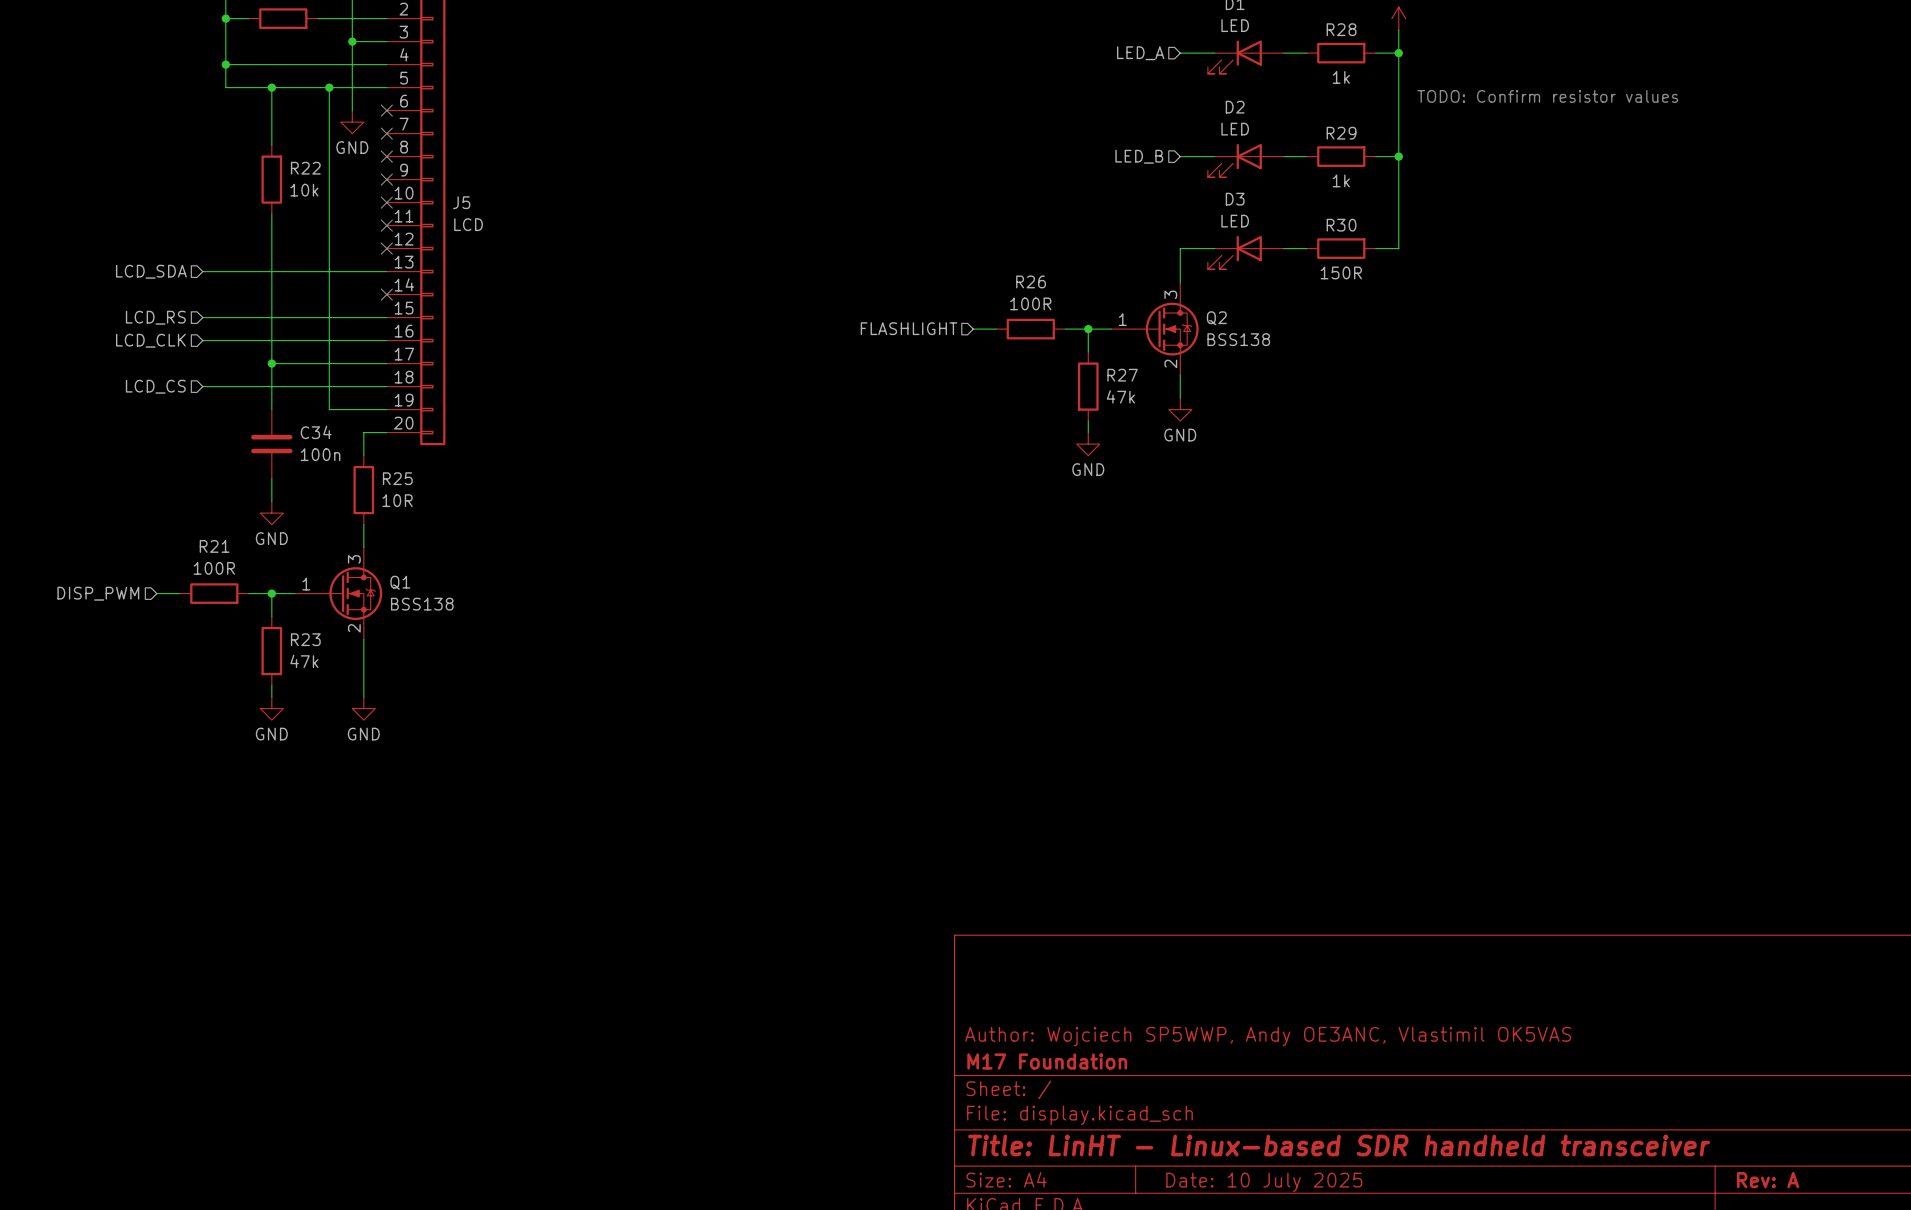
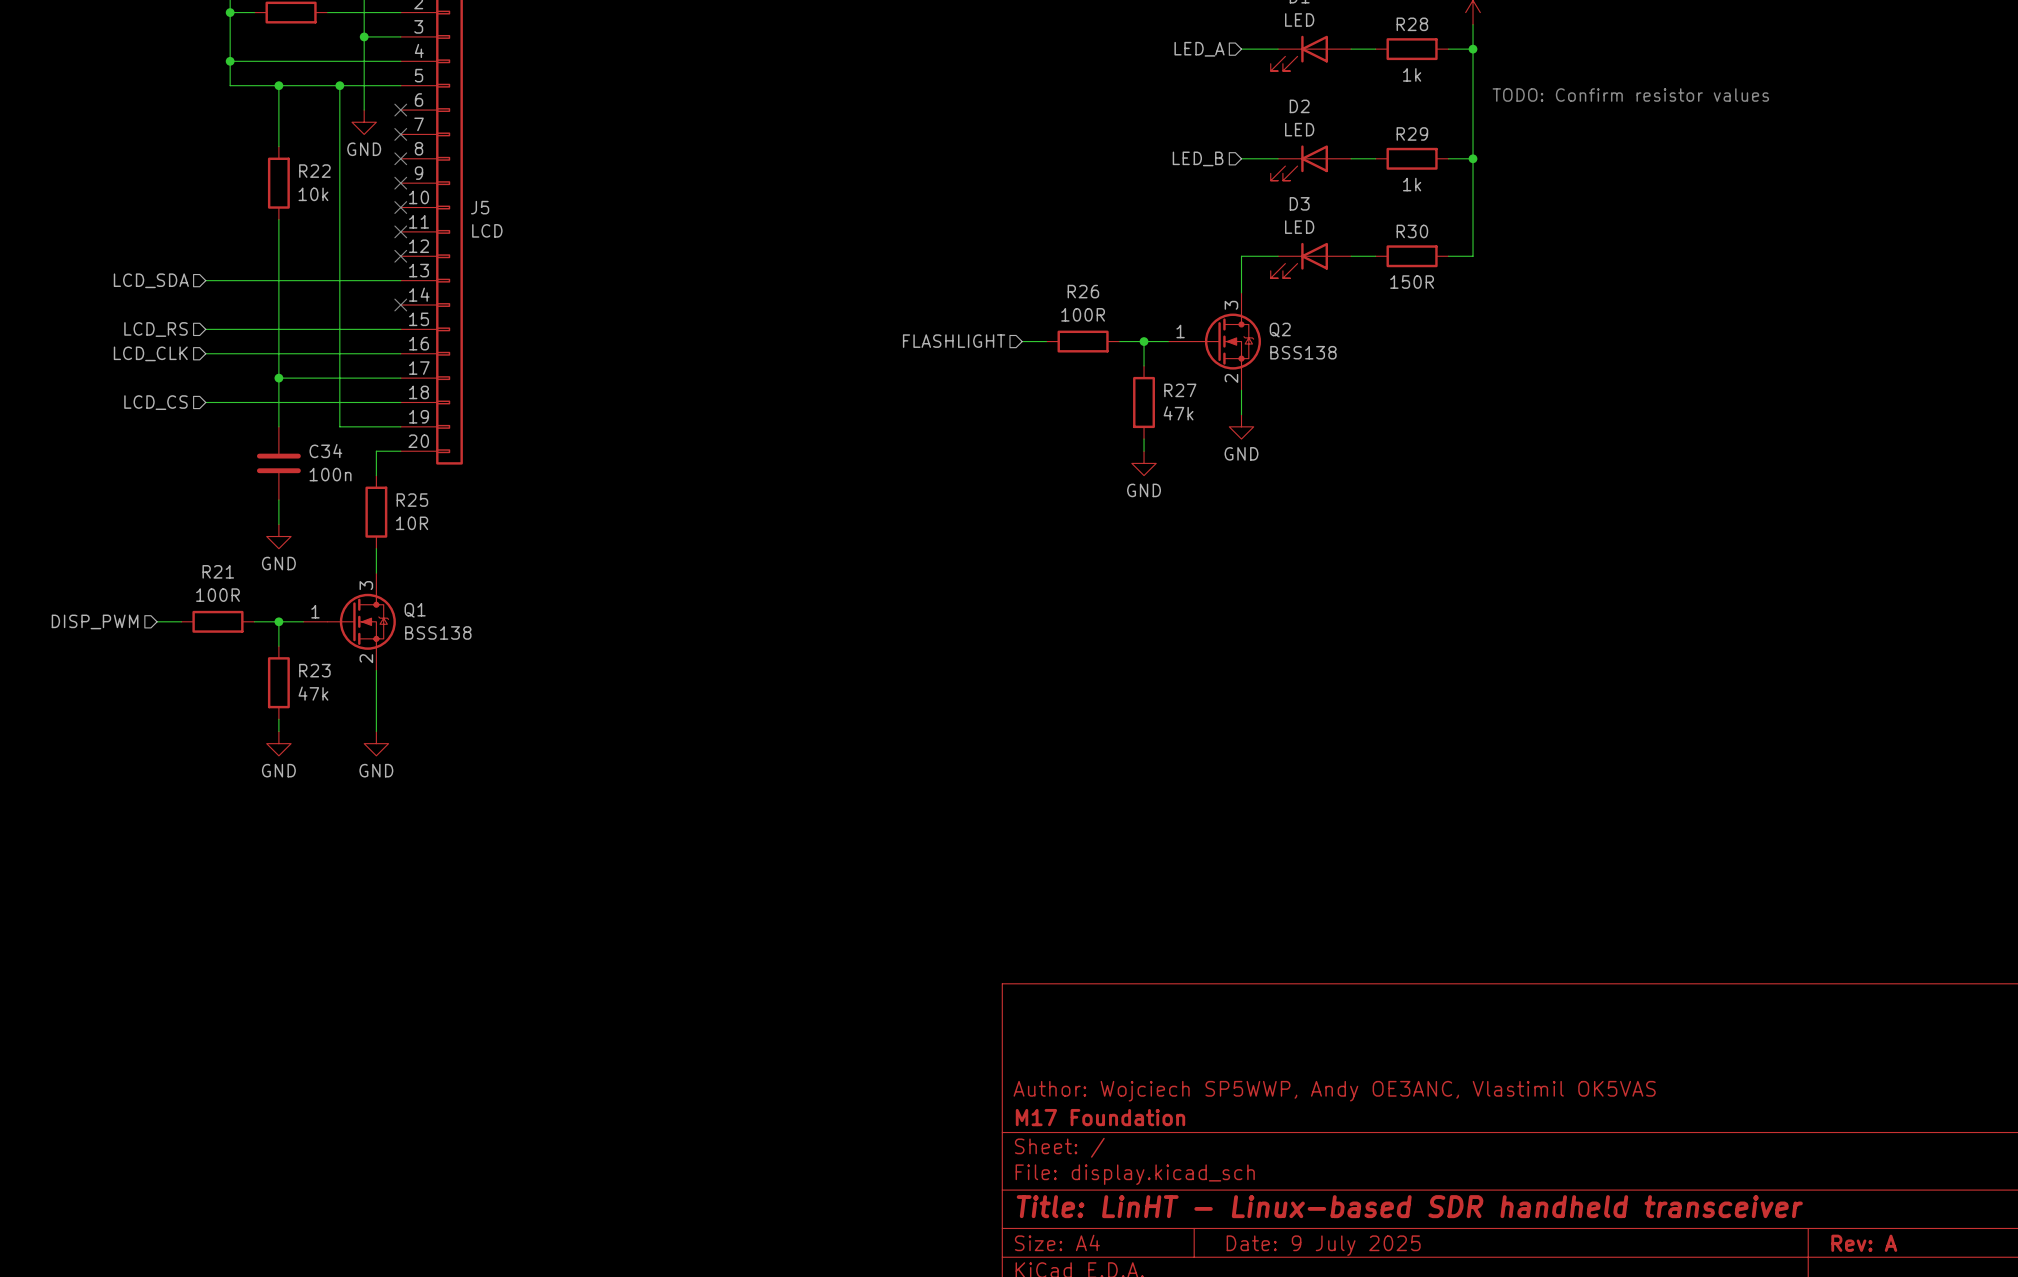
title block: Date: 10 July 2025 (1264, 1182) -> Date: 9 July 2025 (1323, 1245)

